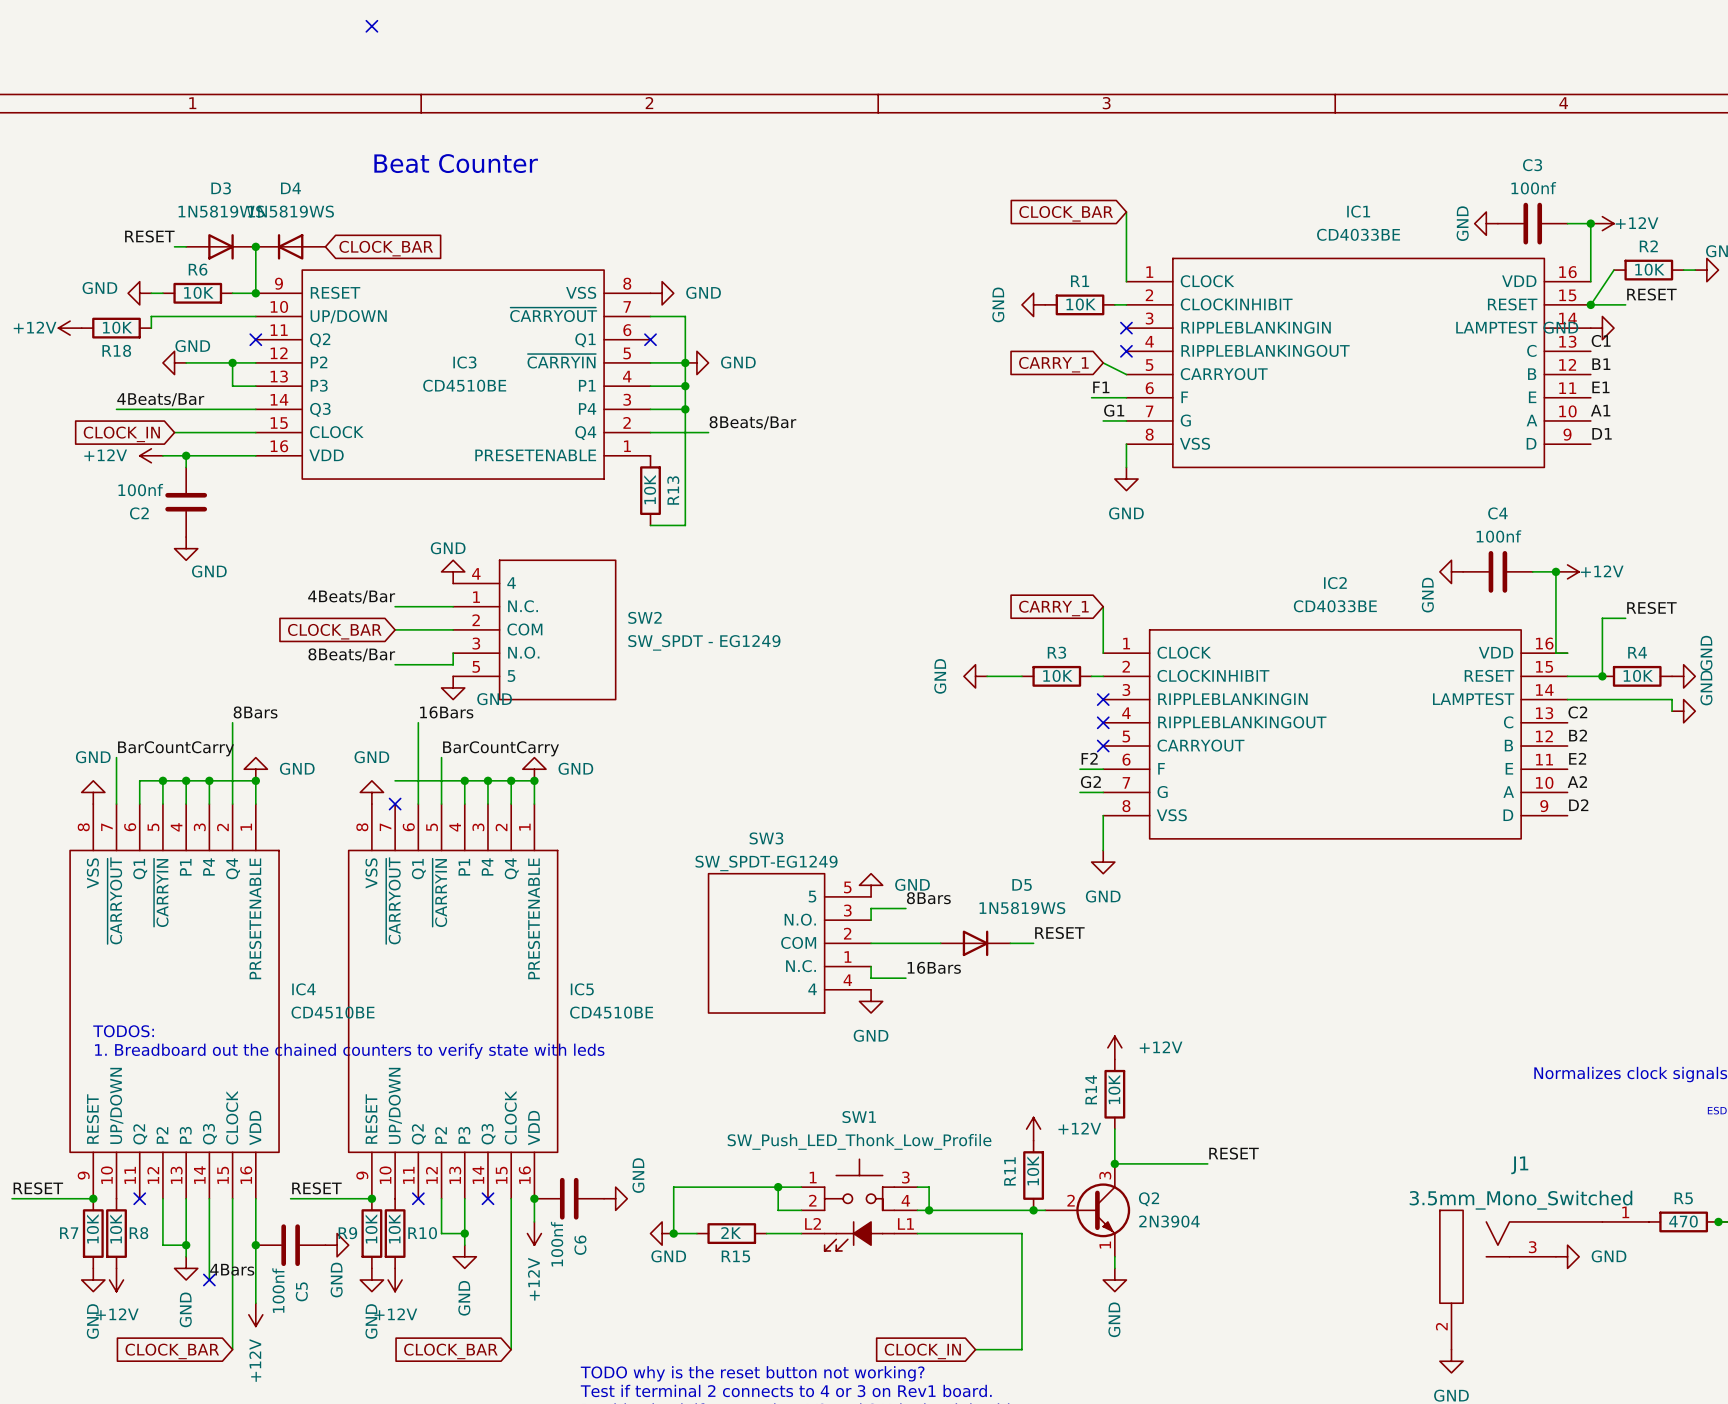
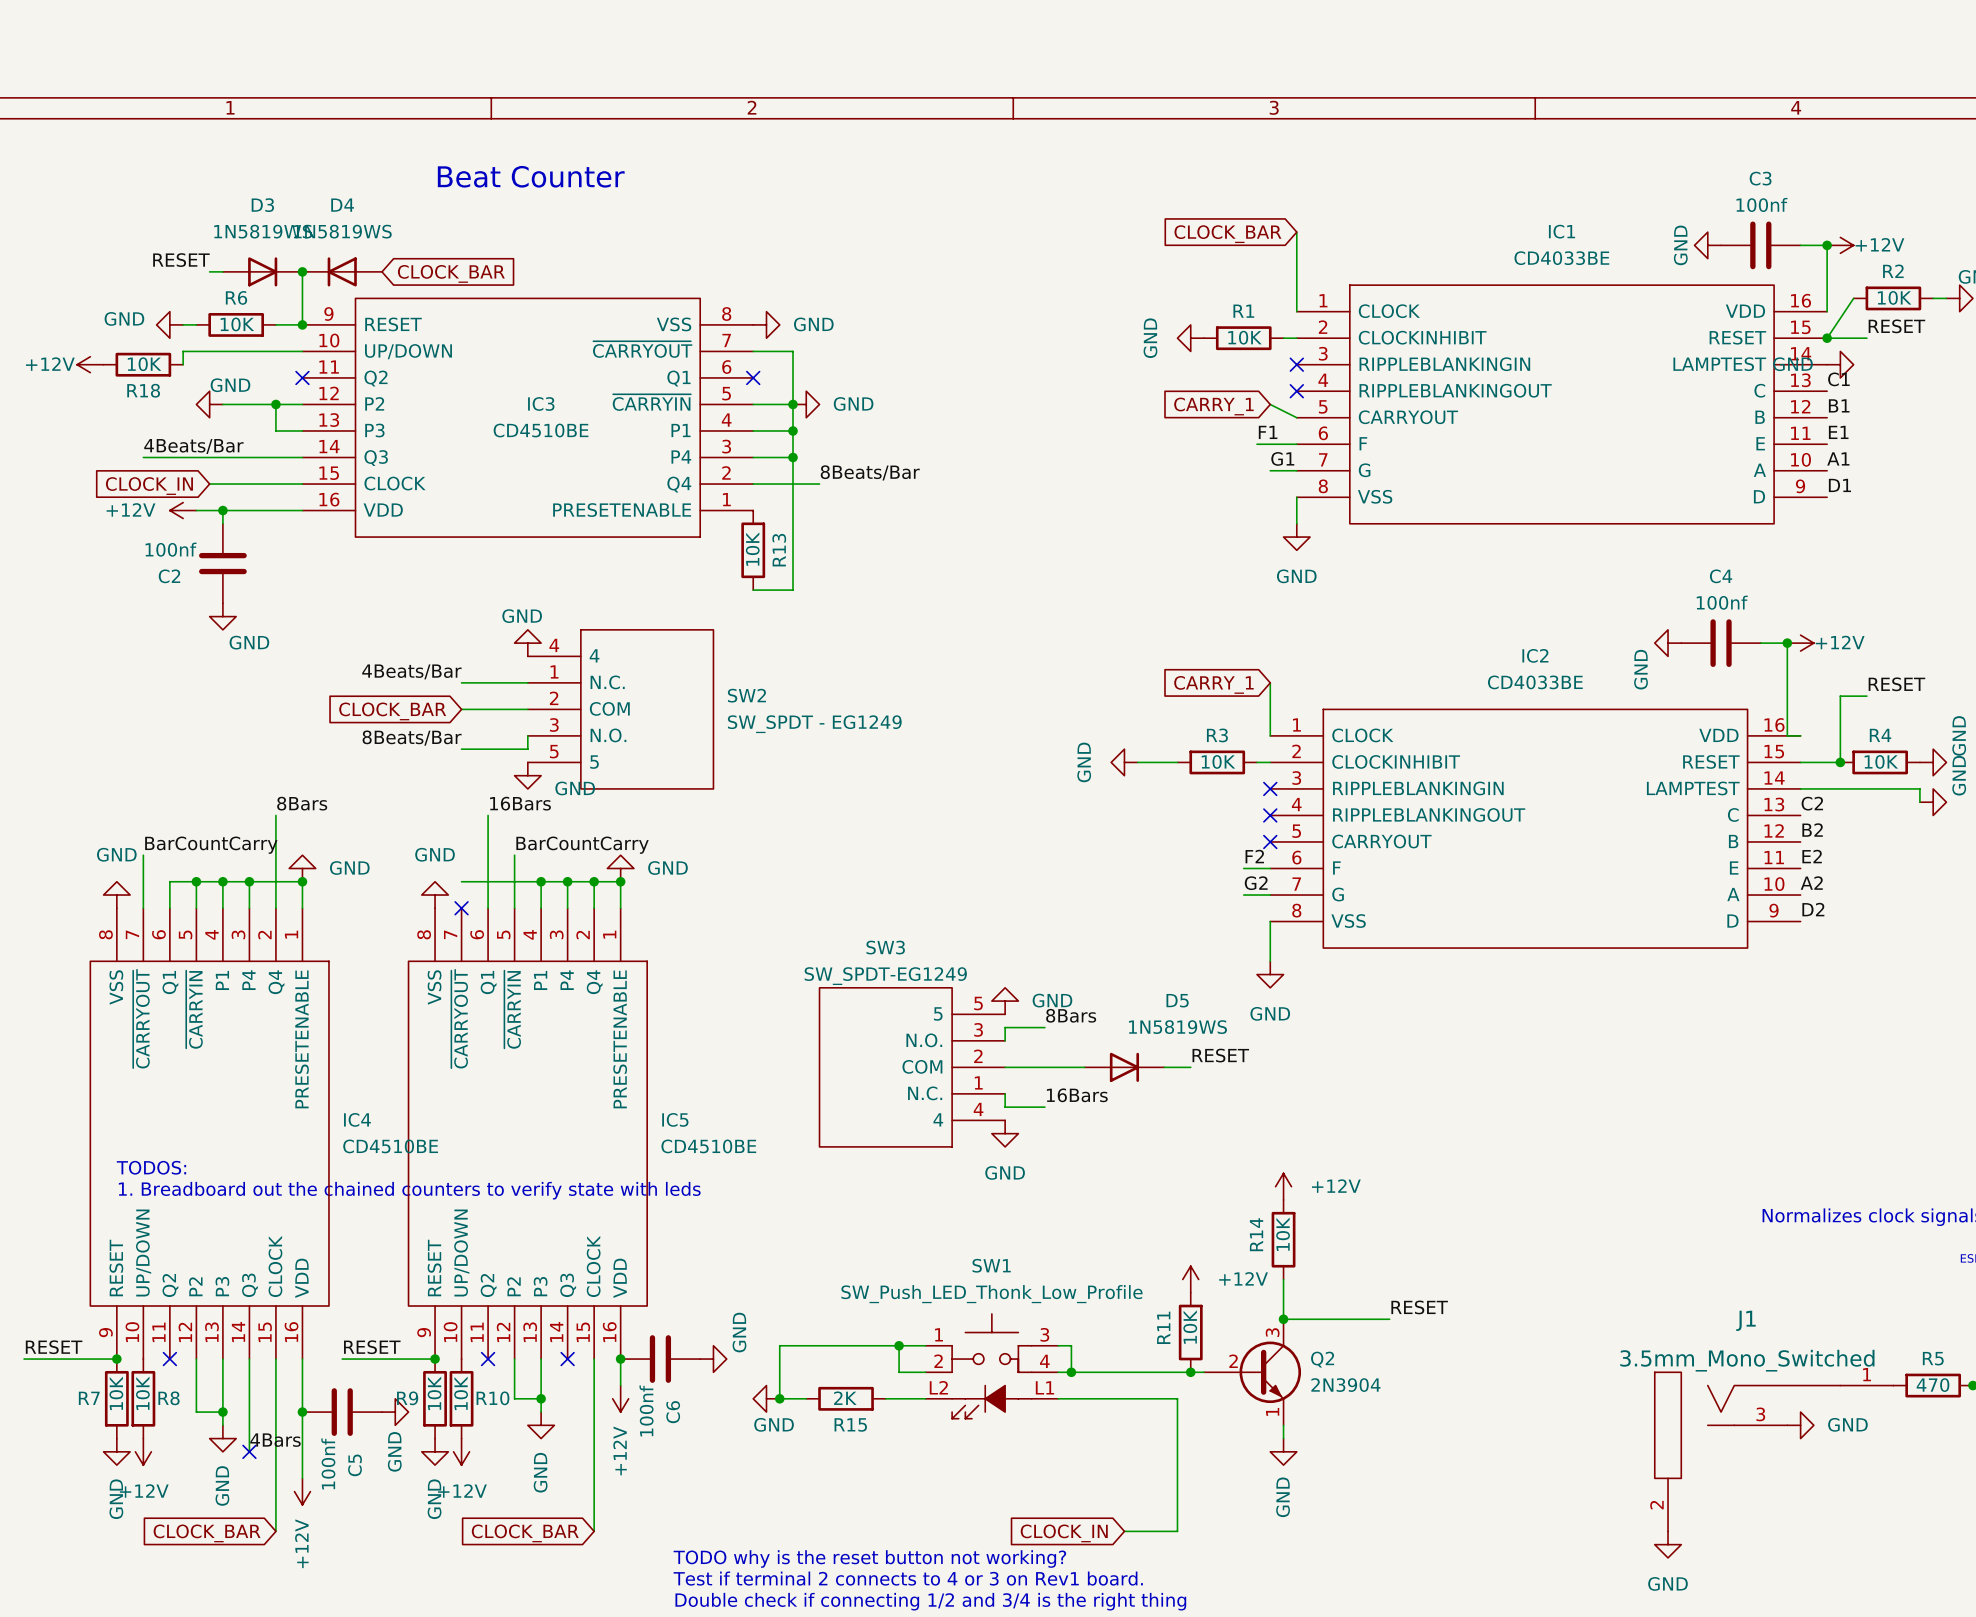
no-connect mark: (371, 26) -> none

